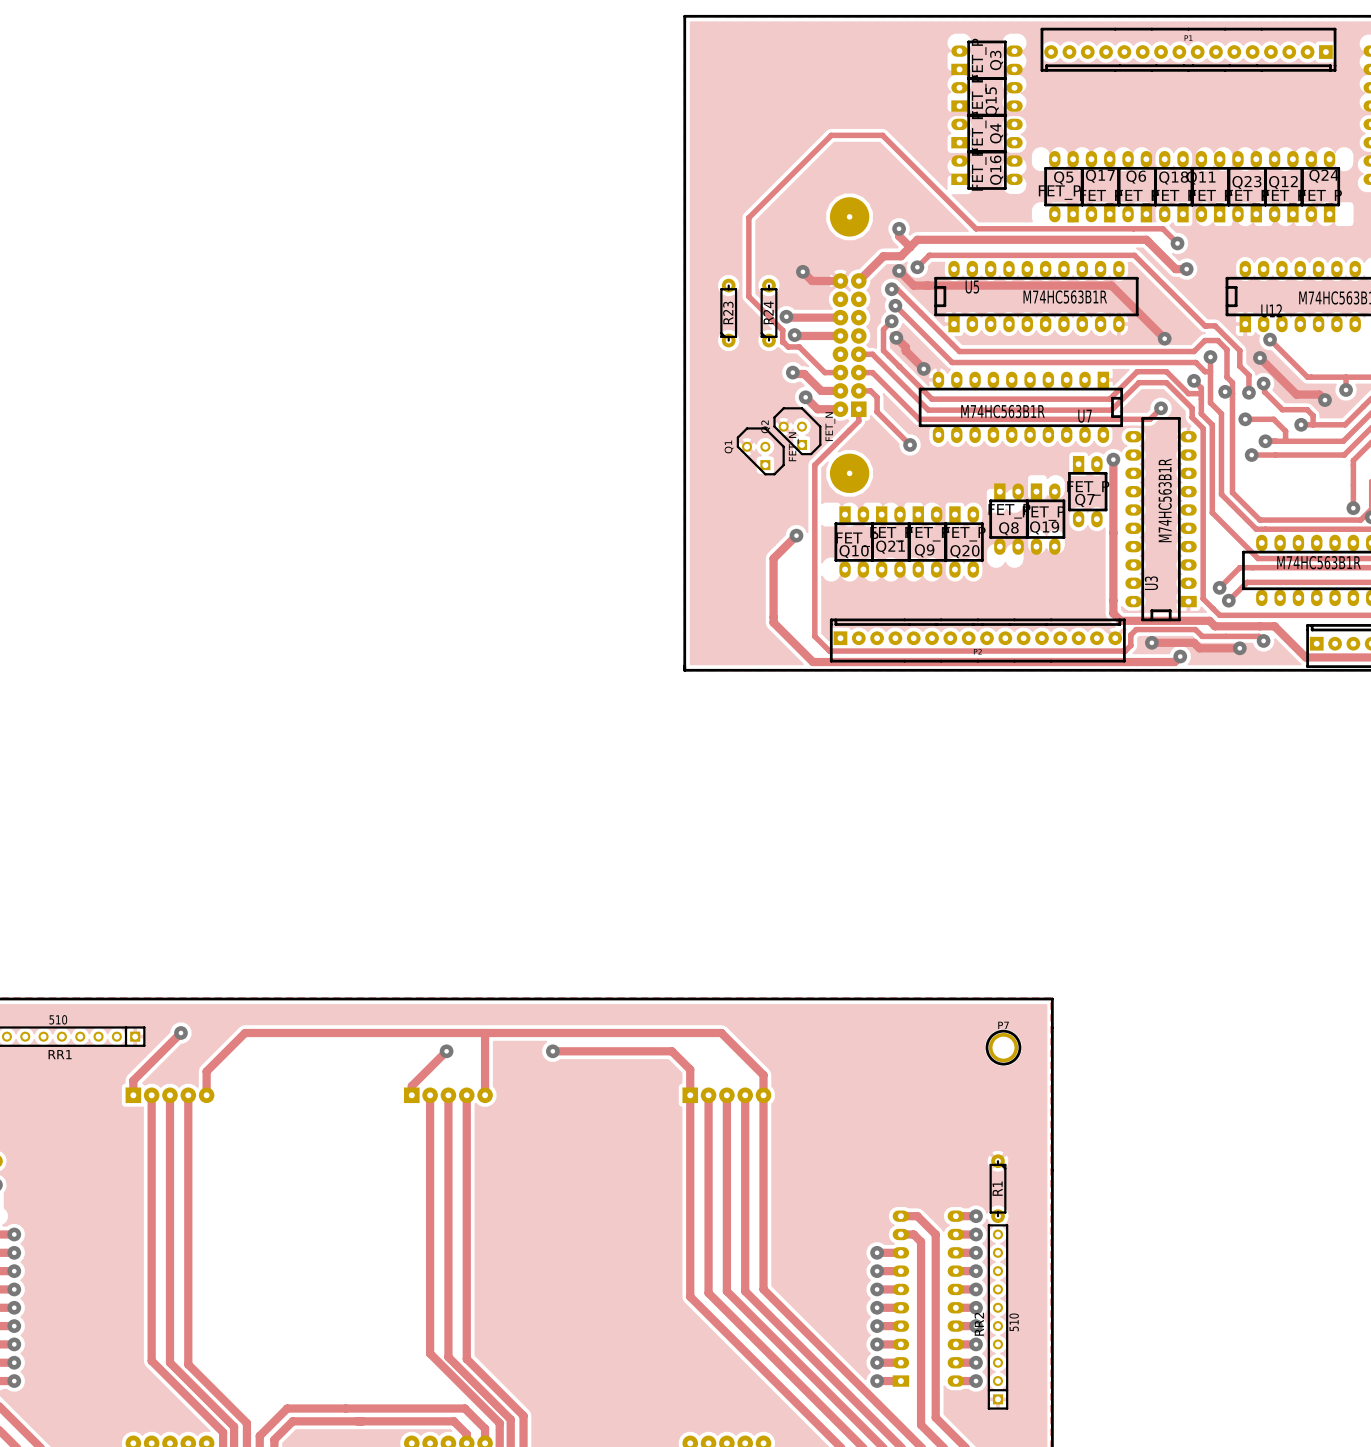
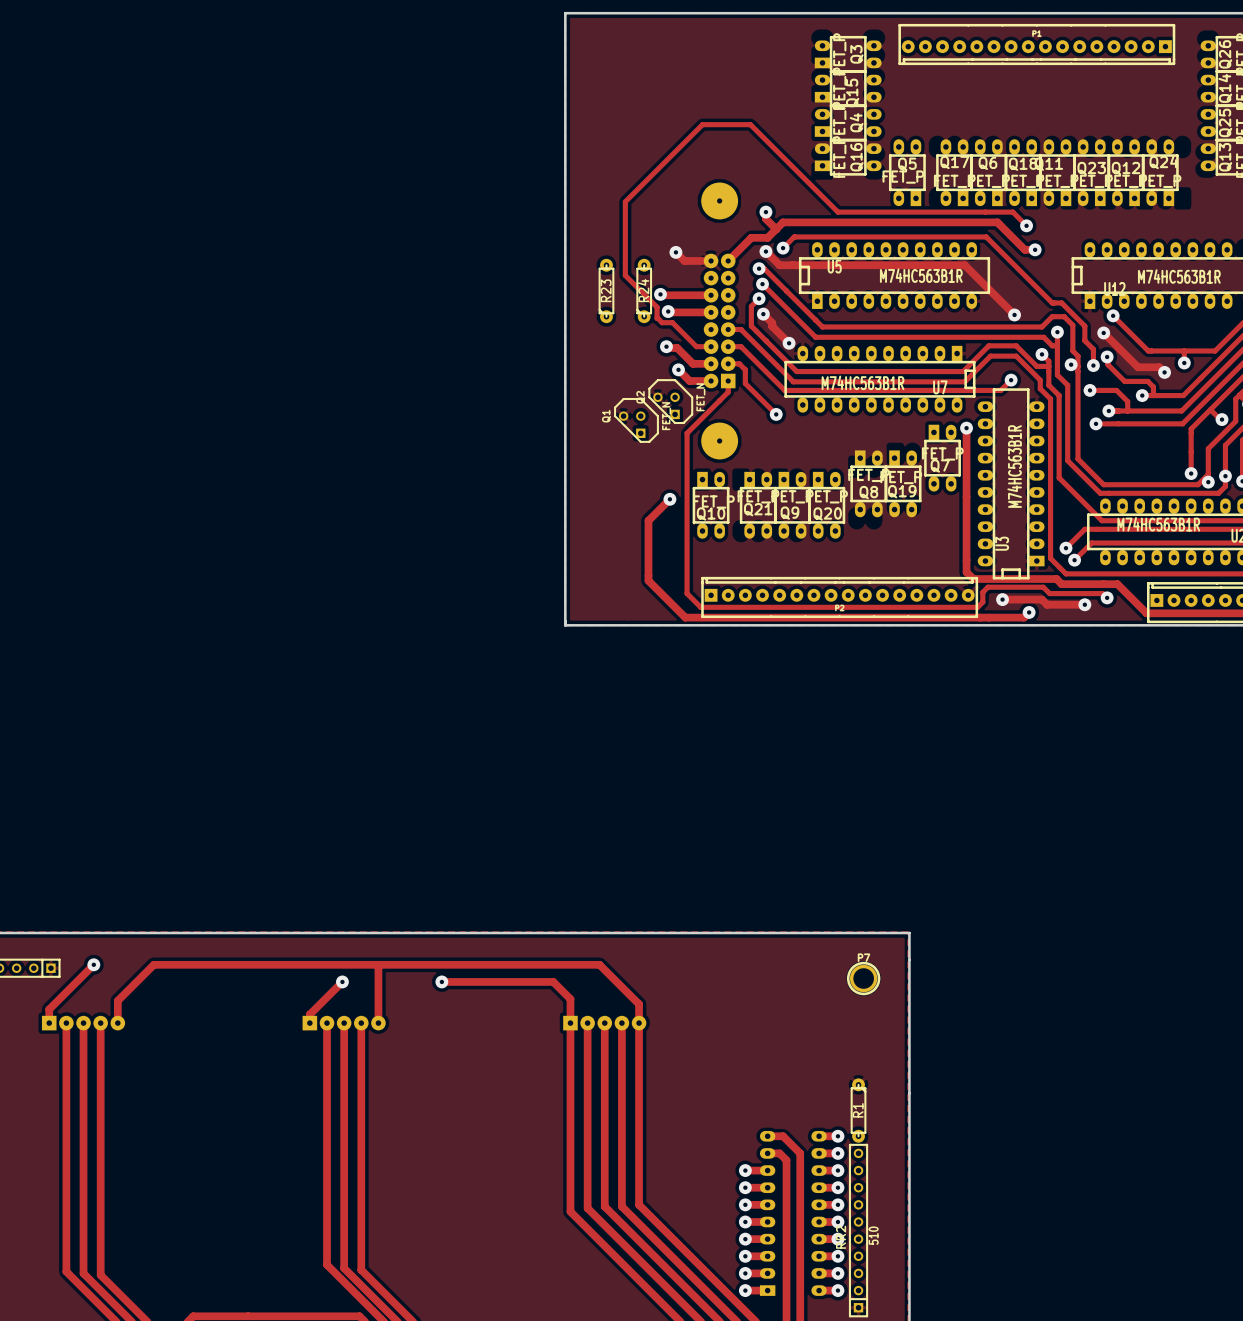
Q5 position: (1063, 186) -> (907, 172)
Q10 position: (854, 542) -> (711, 505)

